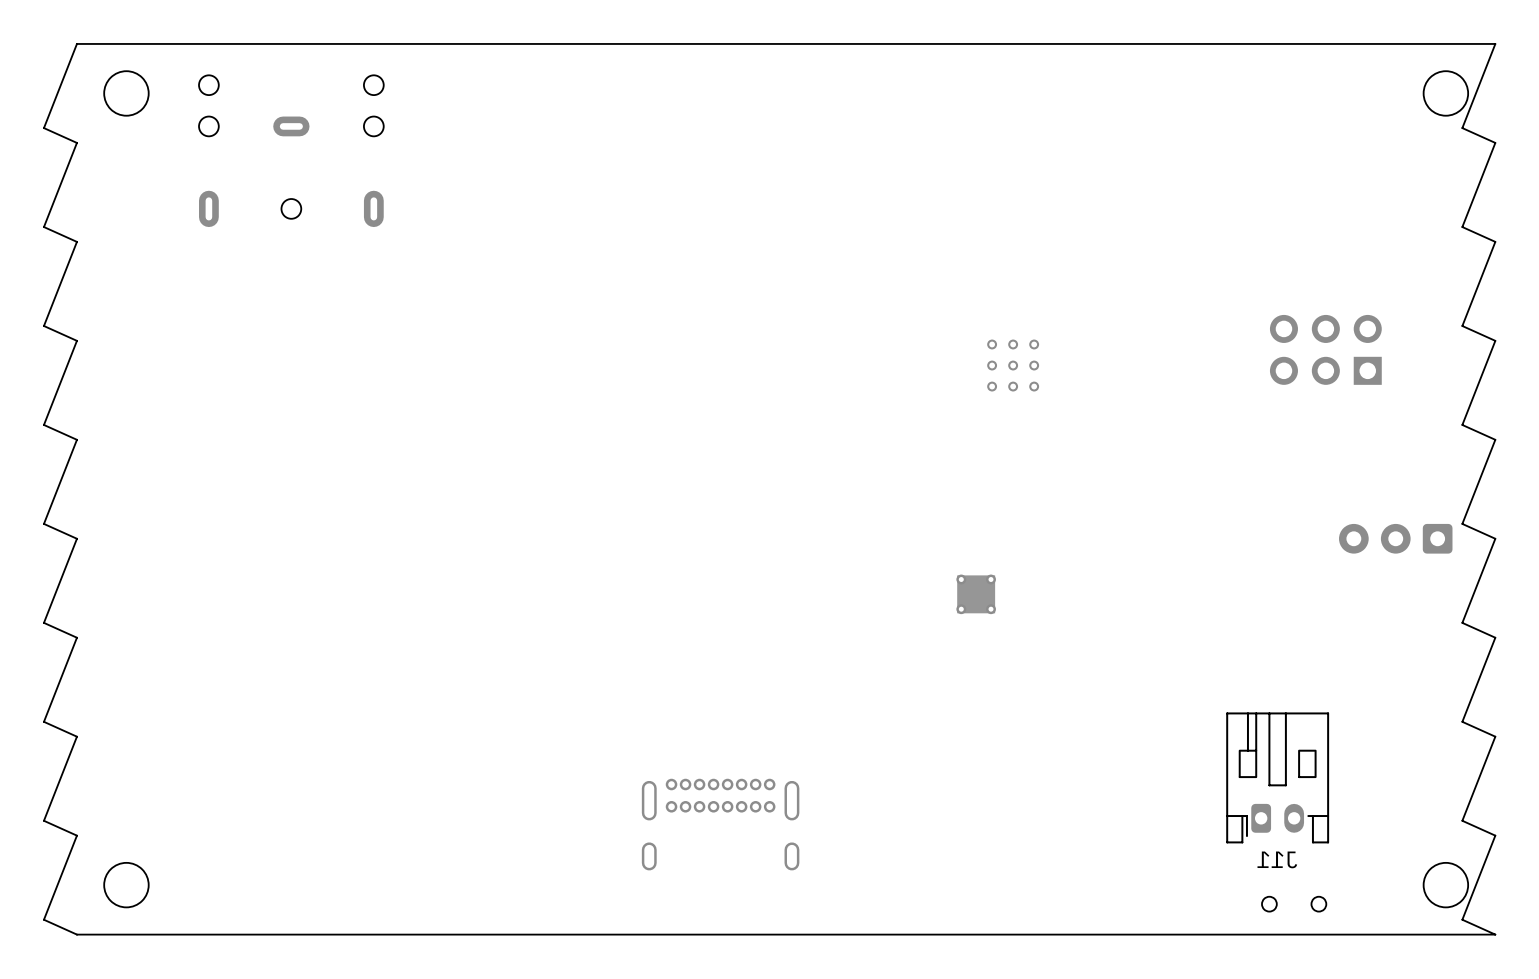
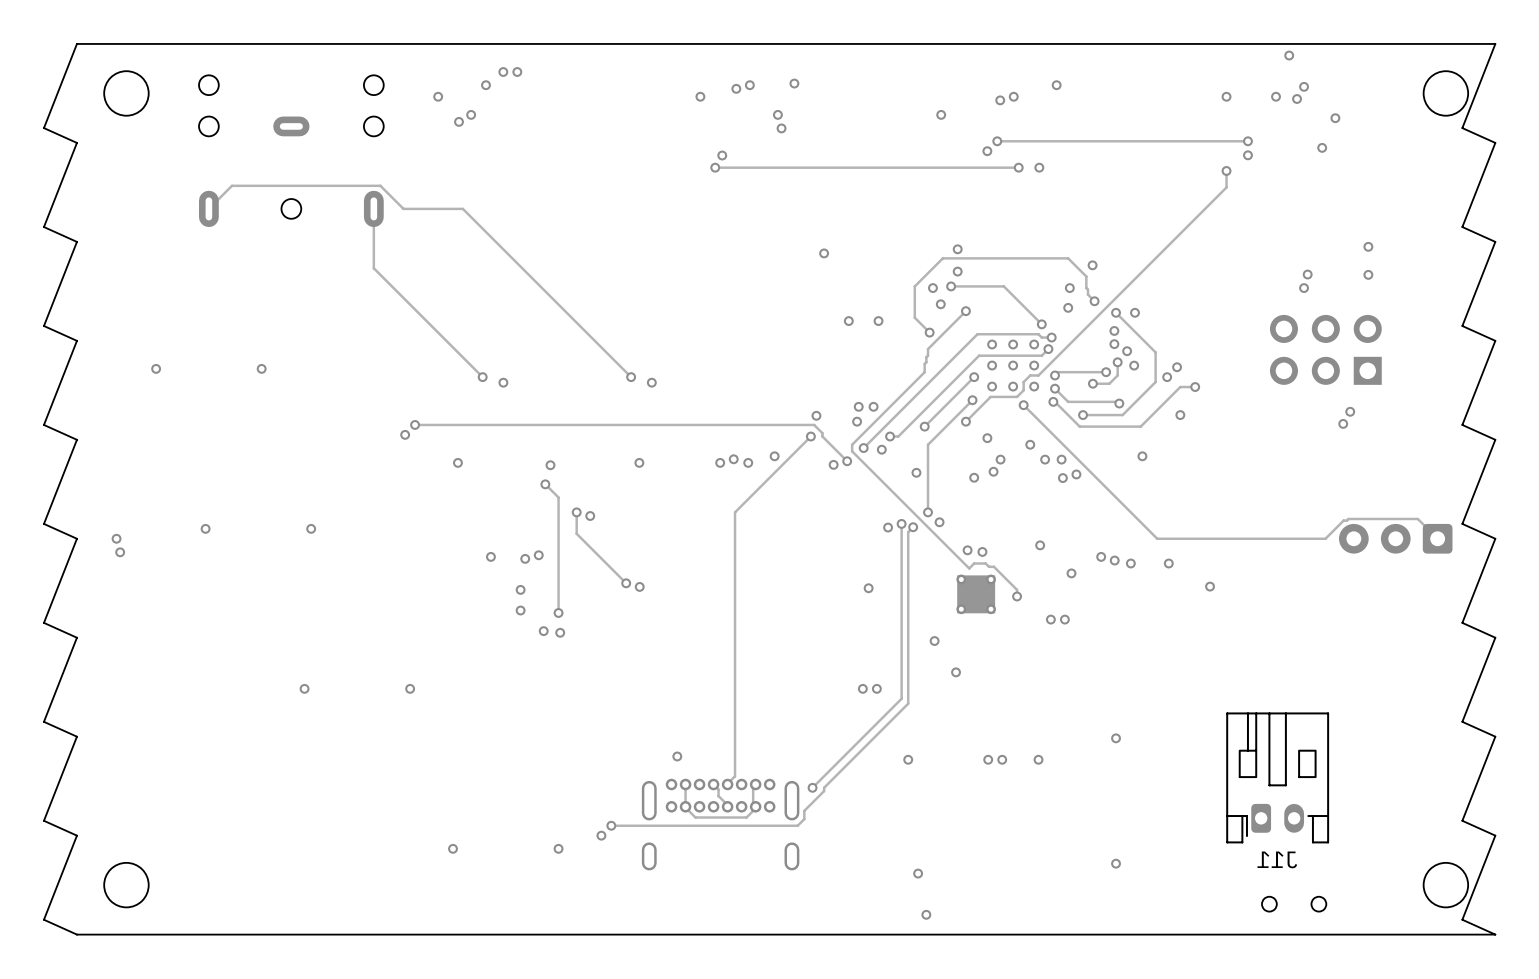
via: none -> (1289, 55)
via: none -> (503, 72)
via: none -> (517, 72)
via: none -> (794, 83)
via: none -> (485, 85)
via: none -> (749, 85)
via: none -> (1056, 85)
via: none -> (1304, 86)
via: none -> (736, 88)
via: none -> (438, 96)
via: none -> (700, 96)
via: none -> (1013, 96)
via: none -> (1226, 96)
via: none -> (1276, 96)
via: none -> (1297, 98)
via: none -> (1000, 100)
via: none -> (471, 114)
via: none -> (777, 114)
via: none -> (941, 114)
via: none -> (1335, 118)
via: none -> (459, 121)
via: none -> (781, 128)
via: none -> (997, 141)
track: none -> (1247, 141) (997, 141)
via: none -> (1247, 141)
via: none -> (1322, 147)
via: none -> (987, 151)
via: none -> (722, 155)
via: none -> (1247, 155)
via: none -> (715, 167)
track: none -> (1018, 167) (715, 167)
via: none -> (1018, 167)
via: none -> (1039, 167)
track: none -> (1226, 170) (1226, 187) (1038, 375) (1030, 375) (1023, 382) (1023, 390) (1017, 396) (990, 396) (965, 421)
via: none -> (1226, 170)
track: none -> (208, 208) (231, 185) (380, 185) (403, 208) (462, 208) (631, 377)
track: none -> (373, 208) (373, 268) (482, 377)
via: none -> (1368, 246)
via: none -> (957, 249)
via: none -> (824, 253)
via: none -> (1092, 265)
via: none -> (957, 271)
via: none -> (1307, 274)
via: none -> (1368, 274)
track: none -> (951, 286) (1003, 286) (1041, 324)
via: none -> (951, 286)
via: none -> (932, 288)
via: none -> (1069, 288)
via: none -> (1304, 288)
track: none -> (1094, 301) (1087, 294) (1086, 276) (1068, 258) (942, 258) (914, 286) (914, 317) (929, 332)
via: none -> (1094, 301)
via: none -> (940, 304)
via: none -> (1068, 307)
track: none -> (965, 311) (928, 349) (924, 372) (852, 444) (852, 451) (969, 568) (974, 563) (985, 563) (989, 566) (993, 566) (1017, 589) (1017, 596)
via: none -> (965, 311)
track: none -> (1116, 312) (1155, 352) (1155, 382) (1122, 415) (1083, 415)
via: none -> (1116, 312)
via: none -> (1134, 312)
via: none -> (848, 321)
via: none -> (878, 321)
via: none -> (1041, 324)
via: none -> (1114, 330)
via: none -> (929, 332)
track: none -> (1051, 337) (1041, 337) (1038, 334) (977, 334) (863, 448)
via: none -> (1051, 337)
via: none -> (1114, 344)
track: none -> (1048, 349) (1041, 355) (979, 355) (898, 436) (890, 436)
via: none -> (1048, 349)
via: none -> (1127, 351)
track: none -> (1117, 362) (1117, 375) (1109, 383) (1092, 383)
via: none -> (1117, 362)
via: none -> (1134, 365)
via: none -> (1177, 367)
via: none -> (156, 368)
via: none -> (261, 368)
track: none -> (1106, 372) (1058, 372) (1055, 375)
via: none -> (1106, 372)
via: none -> (1055, 375)
via: none -> (482, 377)
via: none -> (631, 377)
track: none -> (974, 377) (924, 426)
via: none -> (974, 377)
via: none -> (1167, 377)
via: none -> (503, 382)
via: none -> (651, 382)
via: none -> (1092, 383)
track: none -> (1195, 387) (1180, 387) (1140, 426) (1079, 426) (1053, 401)
via: none -> (1195, 387)
track: none -> (1055, 388) (1068, 401) (1117, 401) (1119, 403)
via: none -> (1055, 388)
track: none -> (972, 400) (928, 444) (928, 512)
via: none -> (972, 400)
via: none -> (1053, 401)
via: none -> (1119, 403)
track: none -> (1023, 405) (1157, 538) (1325, 538) (1343, 520) (1348, 518) (1417, 518) (1437, 538)
via: none -> (1023, 405)
via: none -> (858, 406)
via: none -> (873, 406)
via: none -> (1350, 411)
via: none -> (816, 415)
via: none -> (1083, 415)
via: none -> (1180, 415)
via: none -> (857, 421)
via: none -> (965, 421)
via: none -> (1343, 423)
track: none -> (415, 424) (814, 424) (822, 433) (822, 436) (847, 461)
via: none -> (415, 424)
via: none -> (924, 426)
via: none -> (405, 434)
track: none -> (810, 436) (735, 512) (735, 776) (727, 784)
via: none -> (810, 436)
via: none -> (890, 436)
via: none -> (987, 438)
via: none -> (1030, 444)
via: none -> (863, 448)
via: none -> (881, 449)
via: none -> (774, 456)
via: none -> (1142, 456)
via: none -> (733, 459)
via: none -> (1000, 459)
via: none -> (1045, 459)
via: none -> (1061, 459)
via: none -> (847, 461)
via: none -> (457, 462)
via: none -> (639, 462)
via: none -> (720, 462)
via: none -> (748, 462)
via: none -> (833, 464)
via: none -> (550, 465)
via: none -> (993, 471)
via: none -> (916, 472)
via: none -> (1076, 474)
via: none -> (974, 477)
via: none -> (1062, 478)
track: none -> (545, 484) (558, 497) (558, 612)
via: none -> (545, 484)
track: none -> (576, 512) (576, 533) (626, 583)
via: none -> (576, 512)
via: none -> (928, 512)
via: none -> (590, 516)
via: none -> (939, 522)
track: none -> (901, 523) (901, 698) (812, 787)
via: none -> (901, 523)
via: none -> (888, 527)
track: none -> (913, 527) (908, 532) (908, 703) (824, 787) (824, 791) (804, 810) (804, 819) (797, 825) (611, 825)
via: none -> (913, 527)
via: none -> (205, 528)
via: none -> (311, 528)
via: none -> (116, 538)
via: none -> (1040, 545)
via: none -> (967, 550)
via: none -> (982, 551)
via: none -> (120, 552)
via: none -> (538, 555)
via: none -> (490, 556)
via: none -> (1101, 556)
via: none -> (525, 558)
via: none -> (1114, 560)
via: none -> (1130, 563)
via: none -> (1168, 563)
via: none -> (1071, 573)
via: none -> (626, 583)
via: none -> (639, 586)
via: none -> (1210, 586)
via: none -> (868, 588)
via: none -> (520, 589)
via: none -> (1017, 596)
via: none -> (520, 610)
via: none -> (558, 612)
via: none -> (1050, 619)
via: none -> (1064, 619)
via: none -> (543, 631)
via: none -> (560, 632)
via: none -> (934, 641)
via: none -> (956, 672)
via: none -> (304, 688)
via: none -> (410, 688)
via: none -> (862, 688)
via: none -> (876, 688)
via: none -> (1116, 738)
via: none -> (677, 756)
via: none -> (908, 759)
via: none -> (988, 759)
via: none -> (1002, 759)
via: none -> (1038, 759)
track: none -> (713, 784) (718, 789) (718, 796) (727, 806)
track: none -> (755, 784) (753, 787) (753, 810) (746, 817) (695, 817) (685, 807) (685, 784)
via: none -> (812, 787)
via: none -> (611, 825)
via: none -> (601, 835)
via: none -> (453, 848)
via: none -> (558, 848)
via: none -> (1116, 863)
via: none -> (918, 873)
via: none -> (926, 914)

